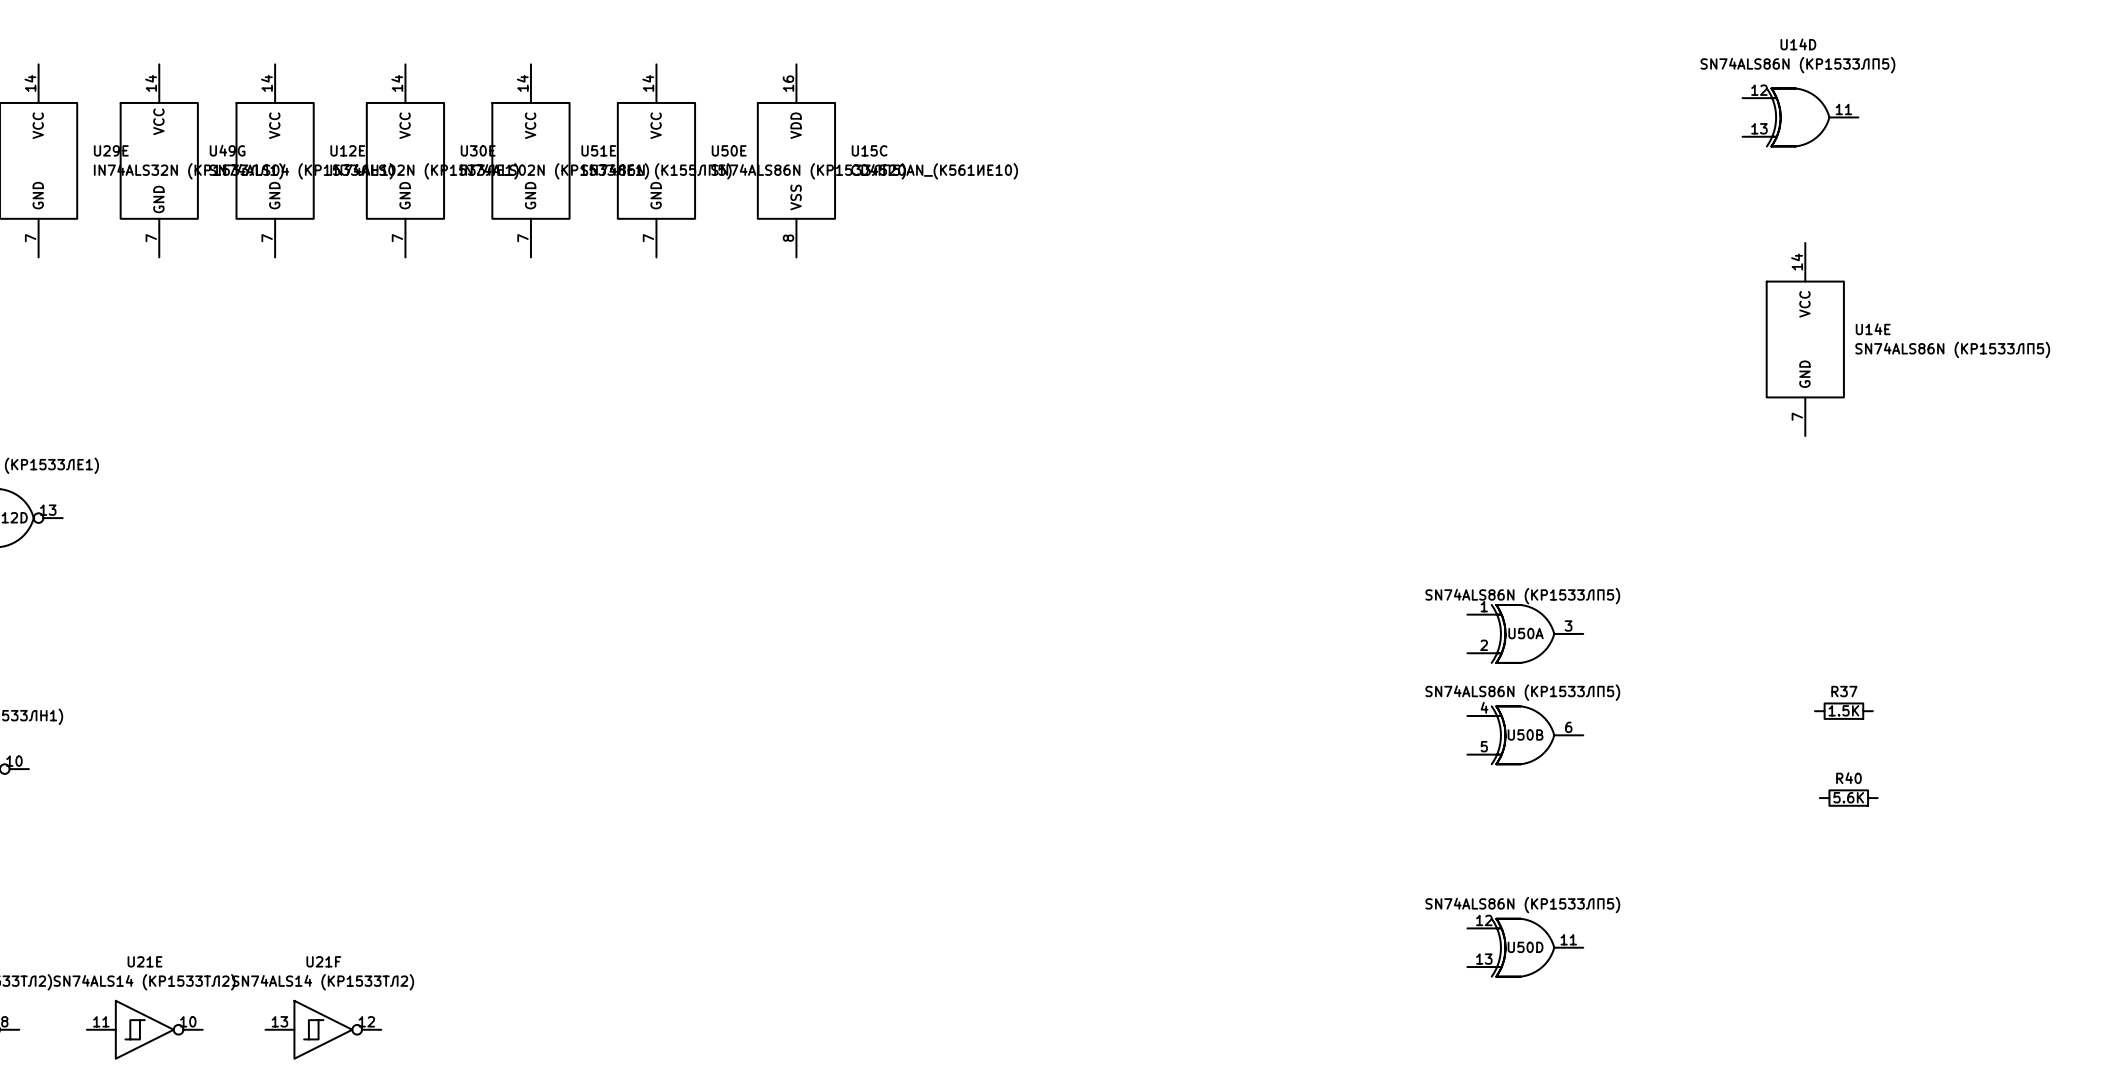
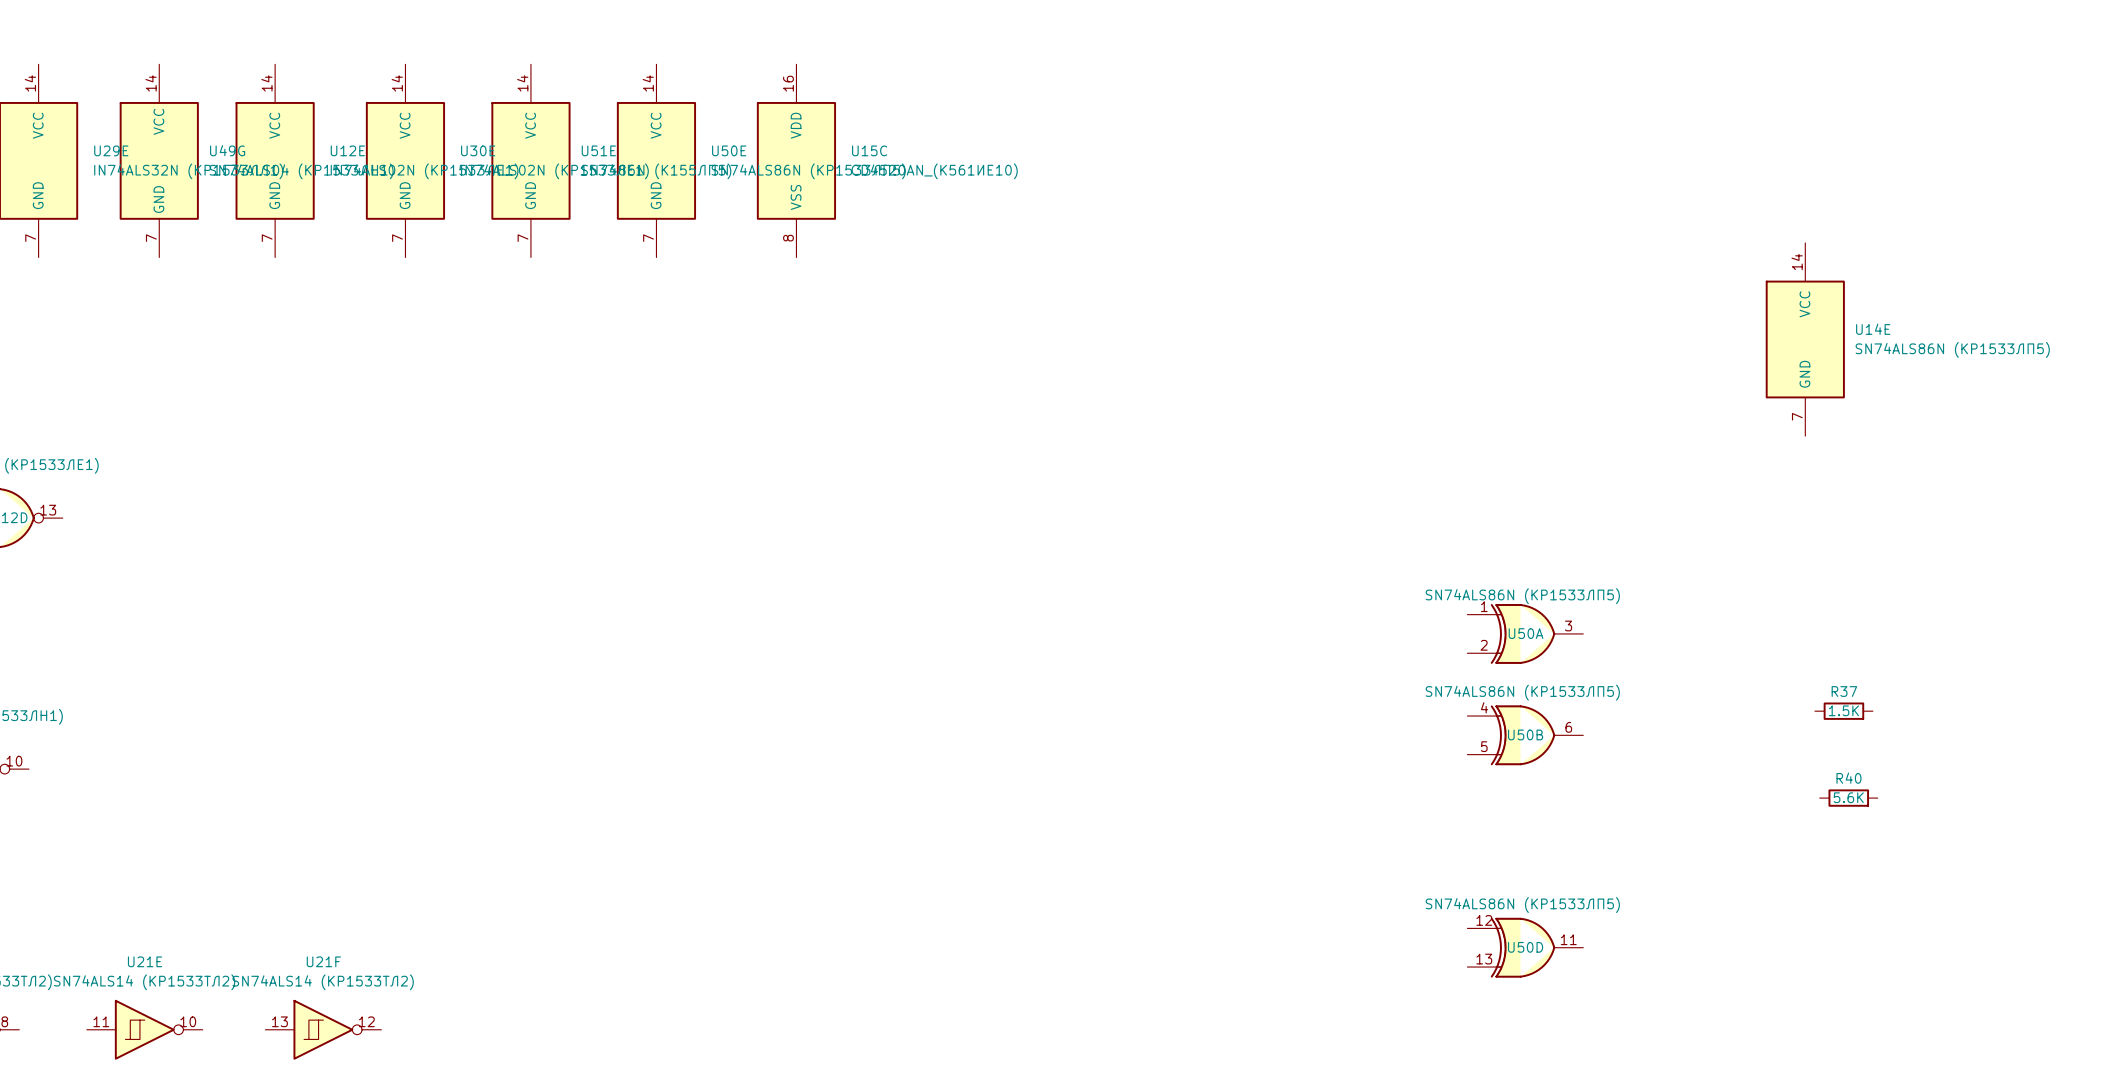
U14D: SN74ALS86N (КР1533ЛП5) (1800, 117) -> none

